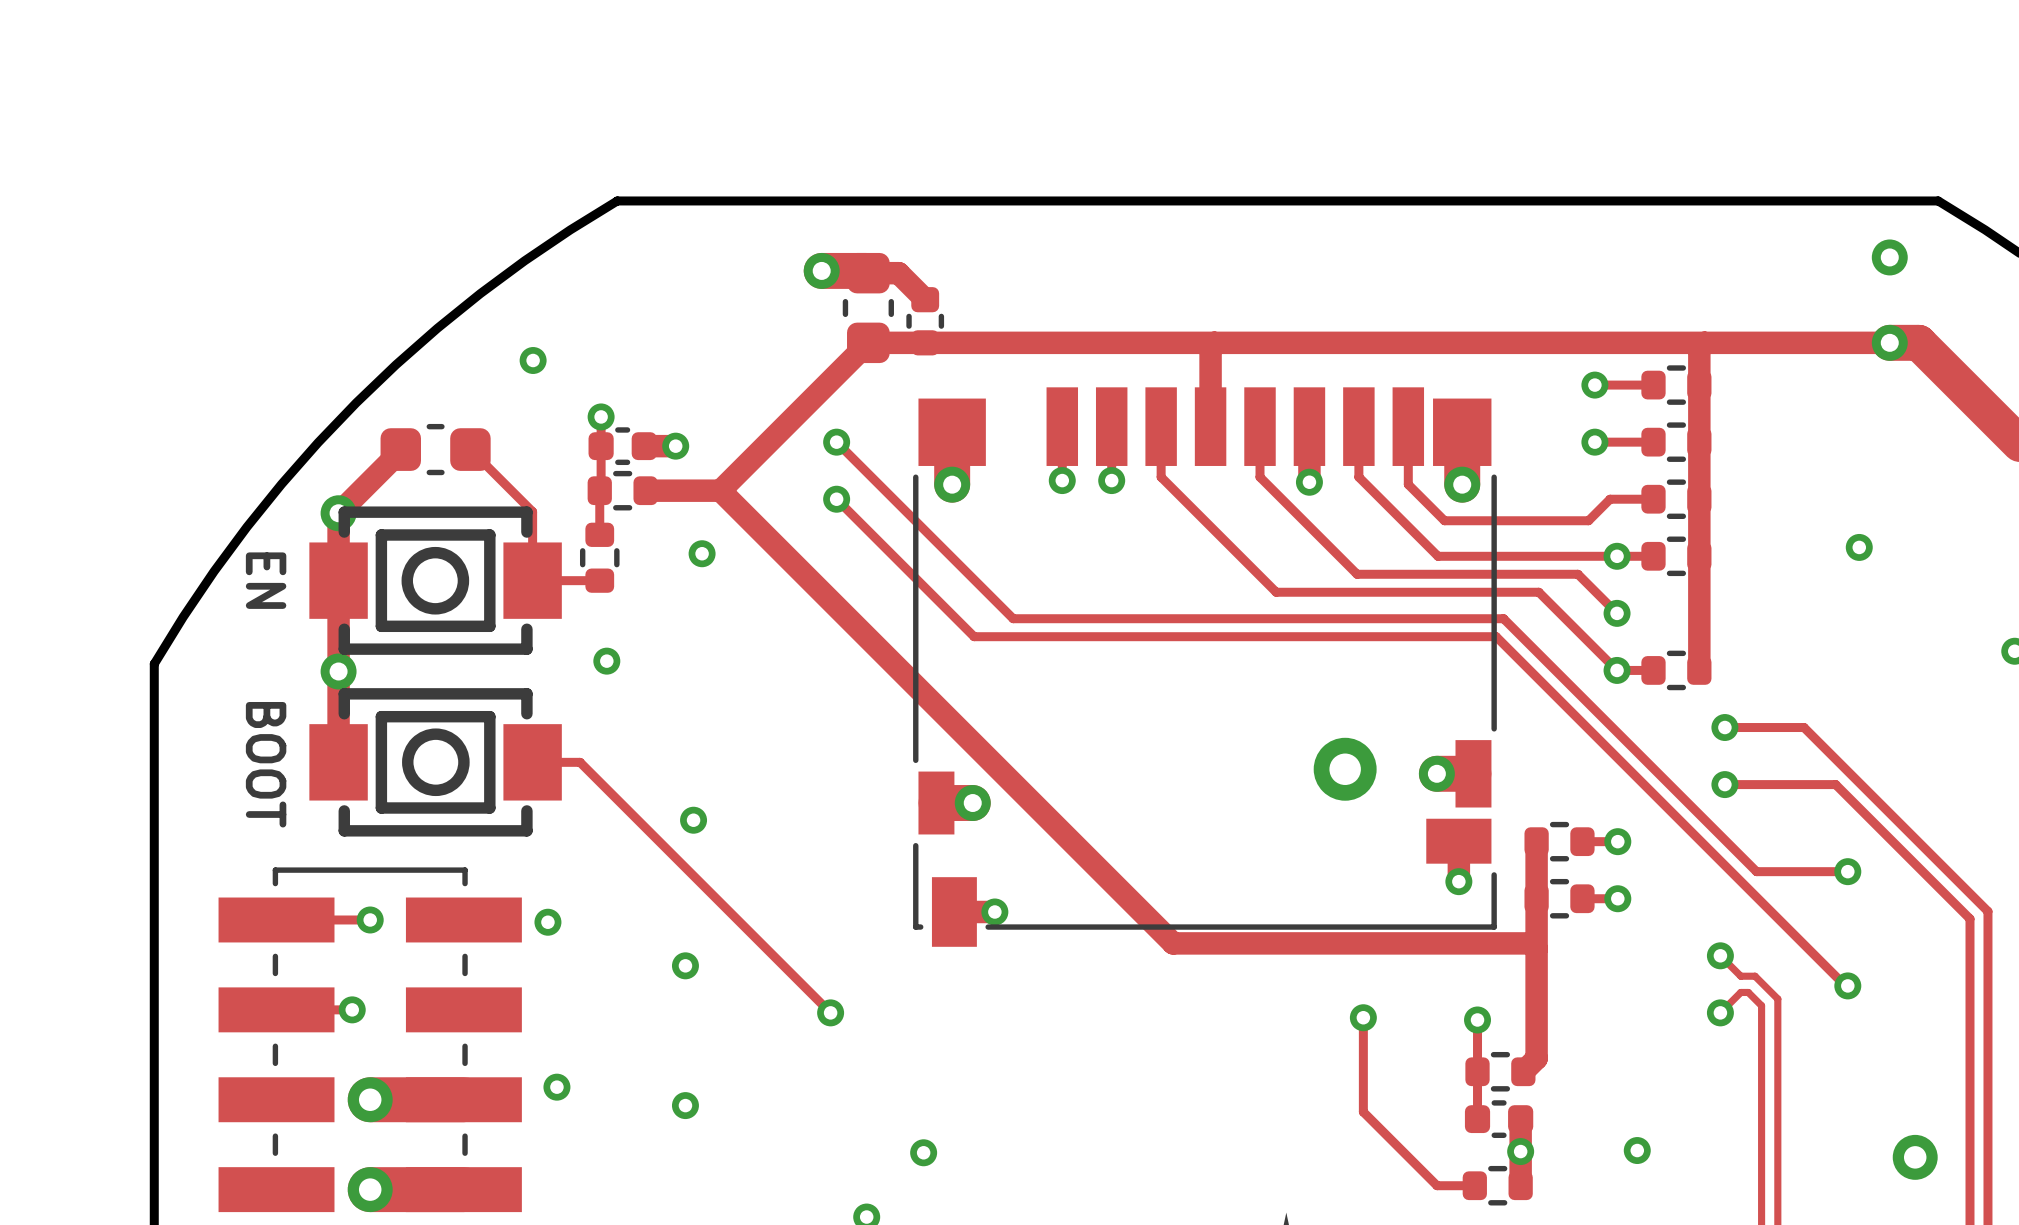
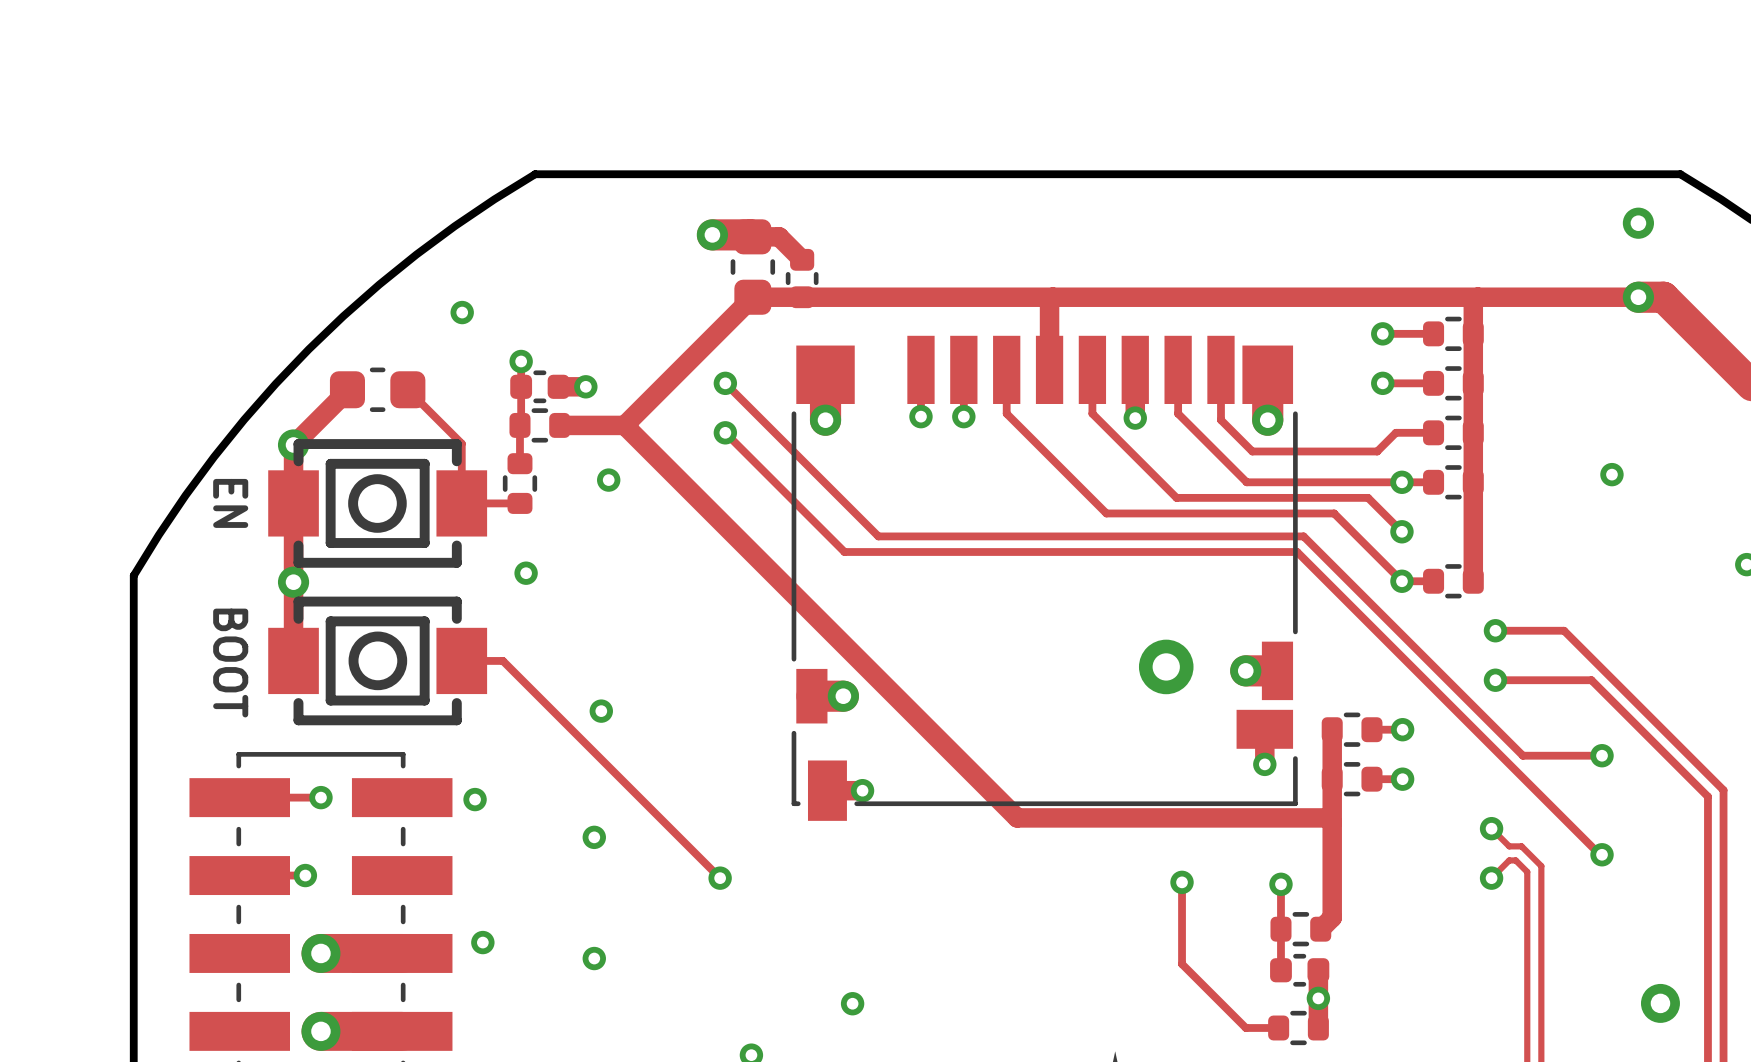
via: (1637, 1150) -> none
via position: (923, 1152) -> (852, 1003)

